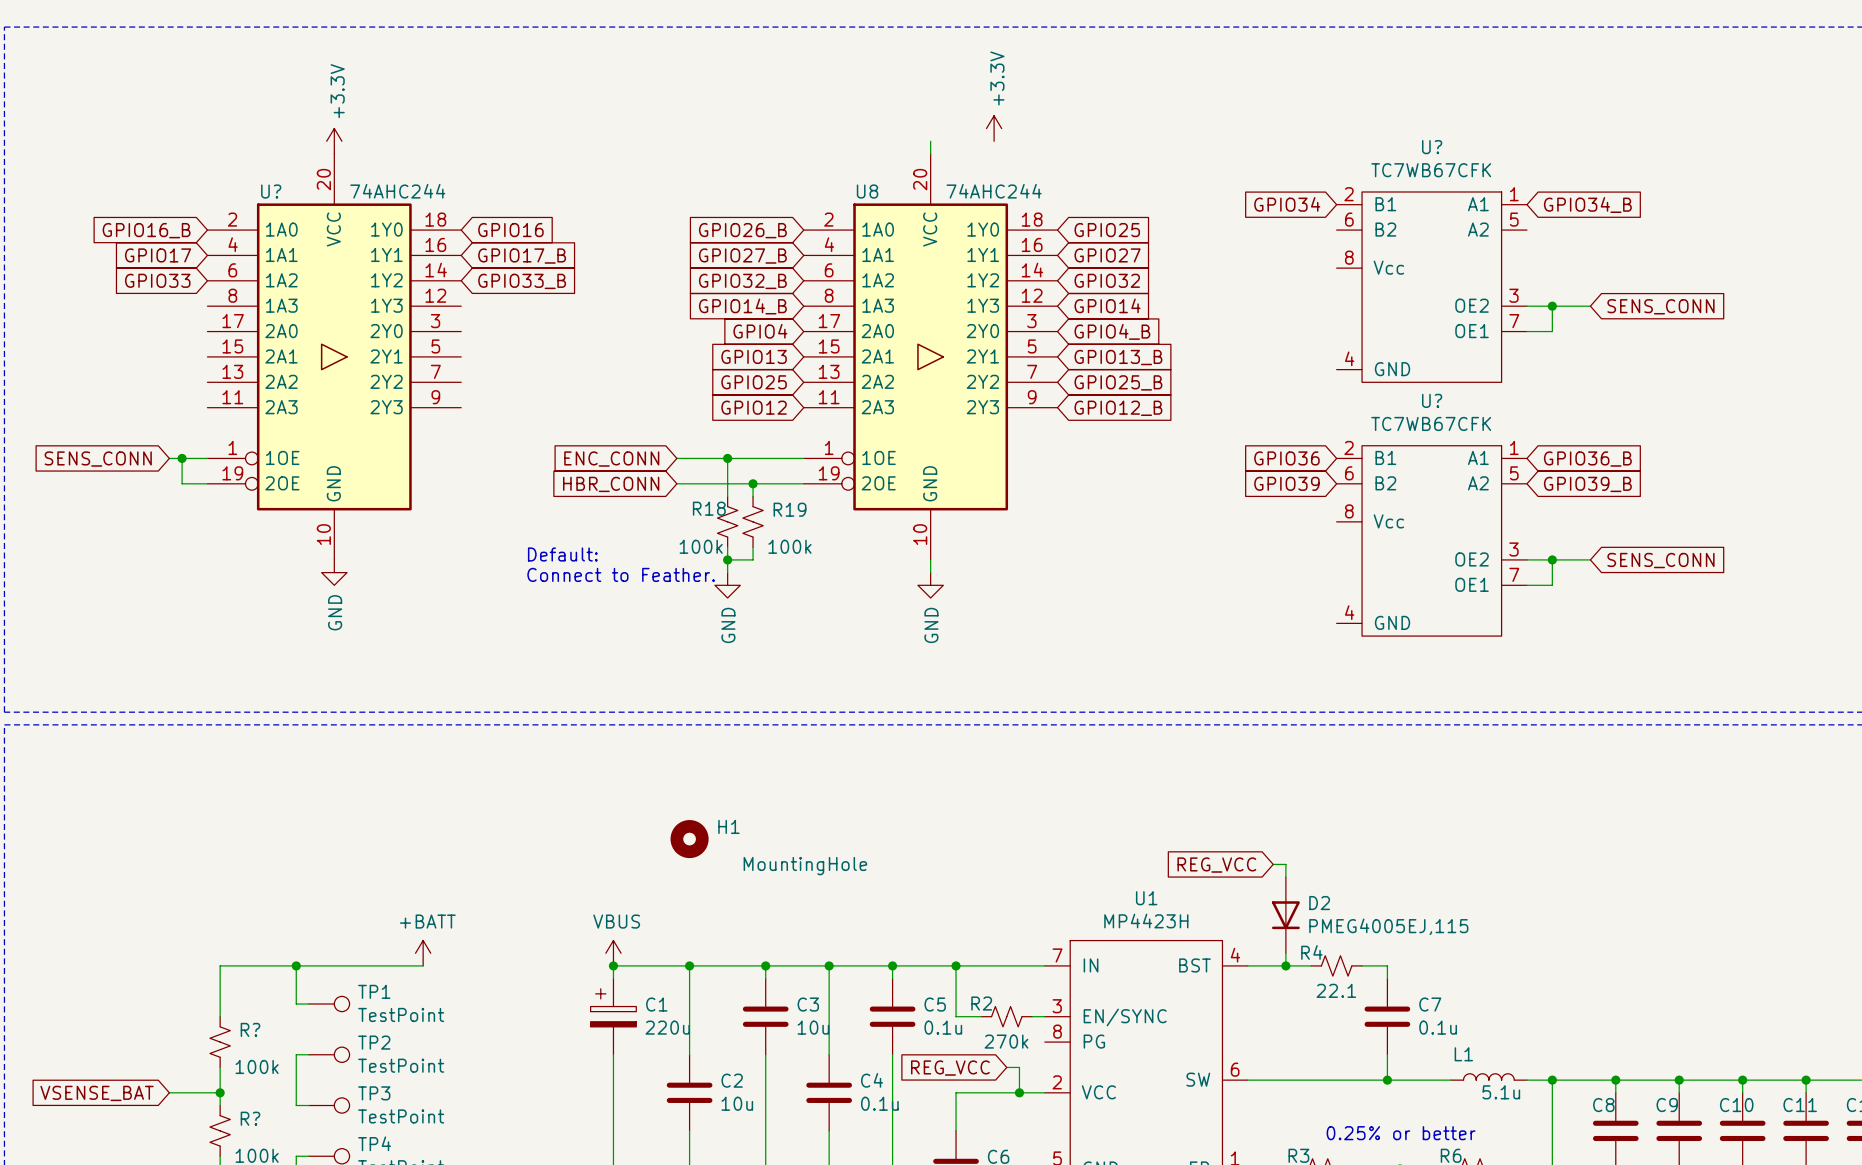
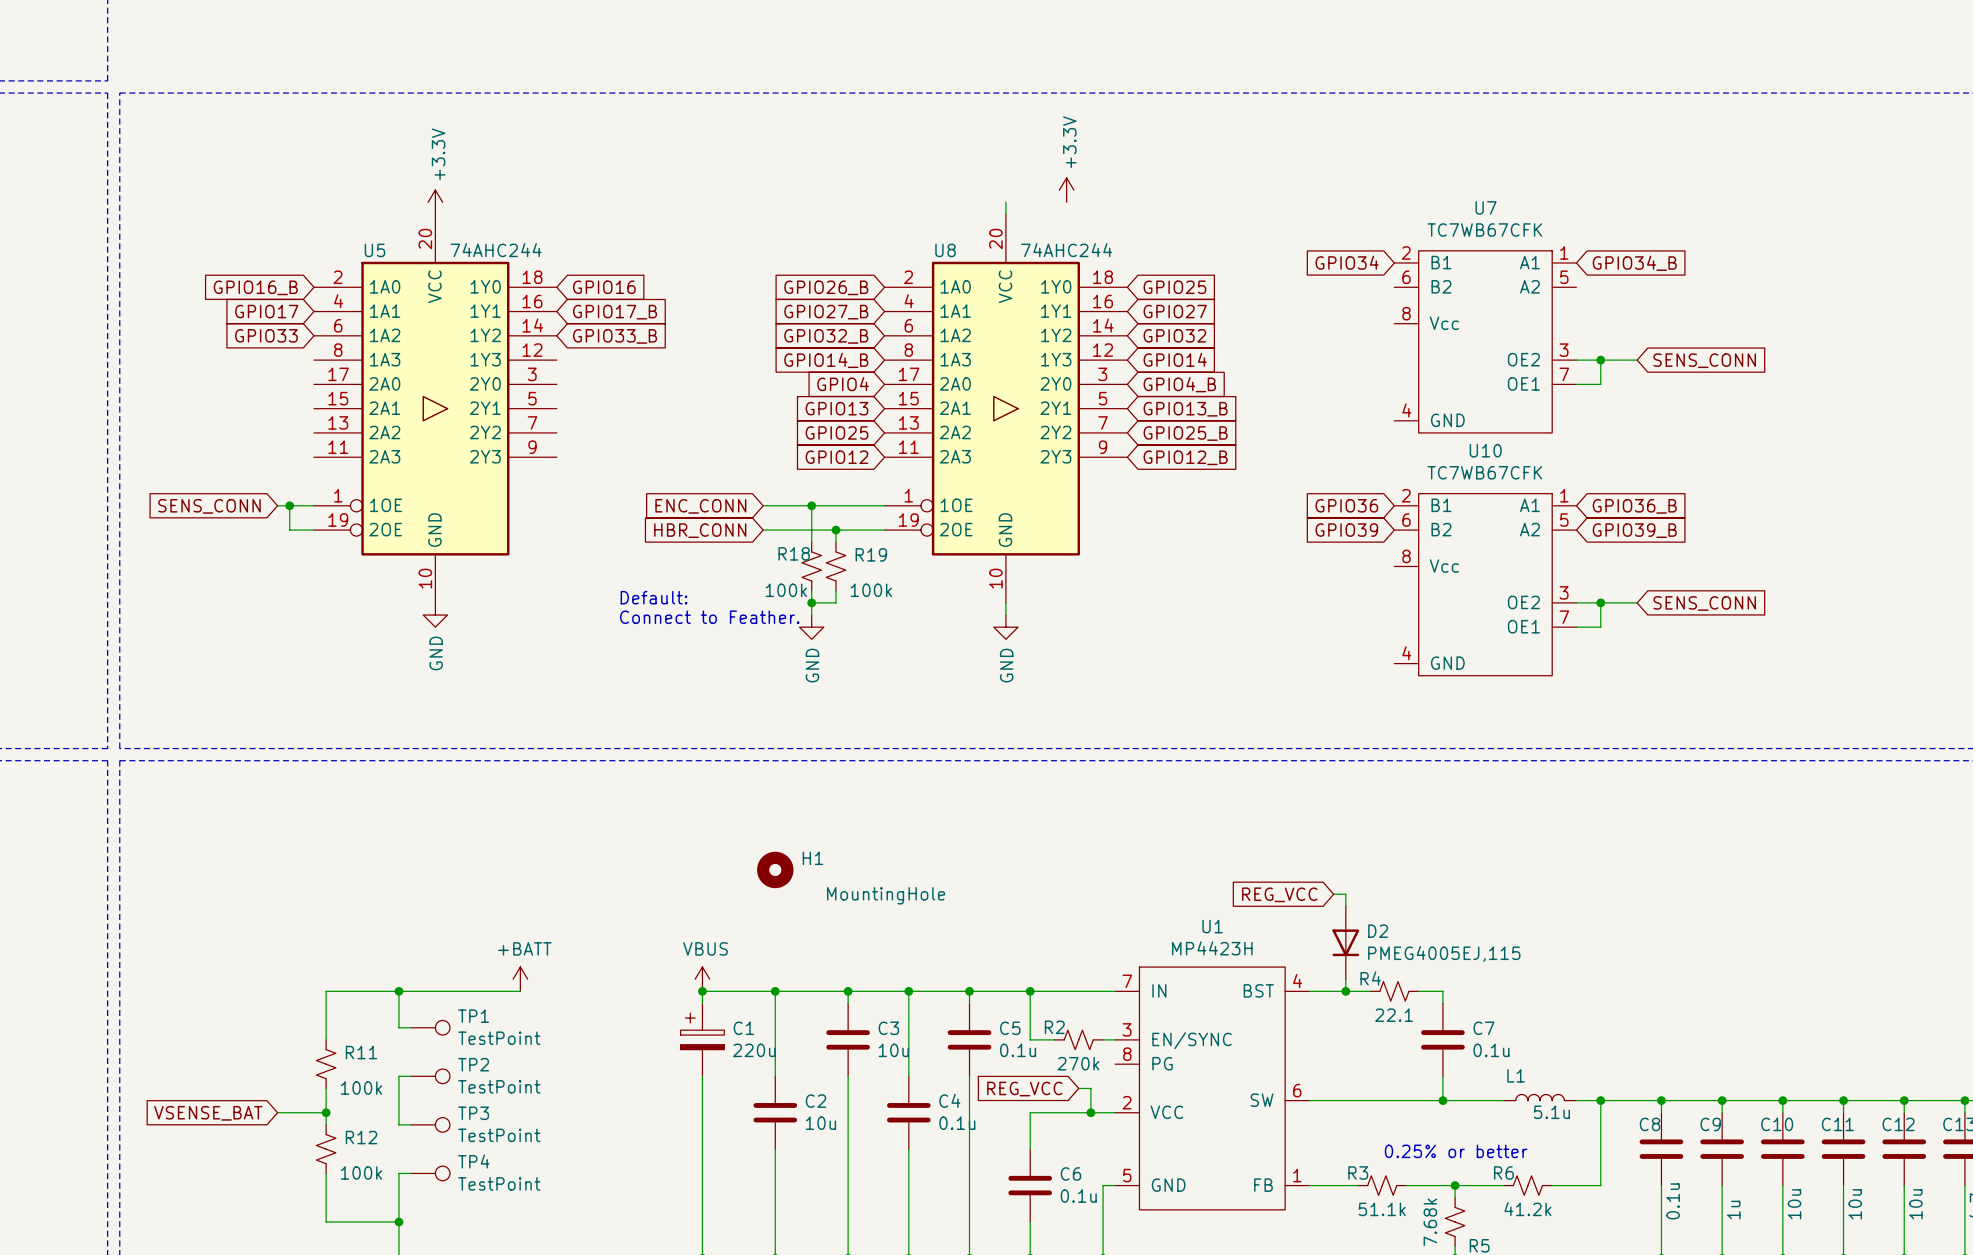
U? name: U? (1432, 147) -> U7 (1486, 207)
U? name: U? (271, 191) -> U5 (374, 250)
U? name: U? (1432, 400) -> U10 (1485, 450)
R? name: R? (250, 1029) -> R11 (361, 1052)
R? name: R? (250, 1118) -> R12 (361, 1137)

